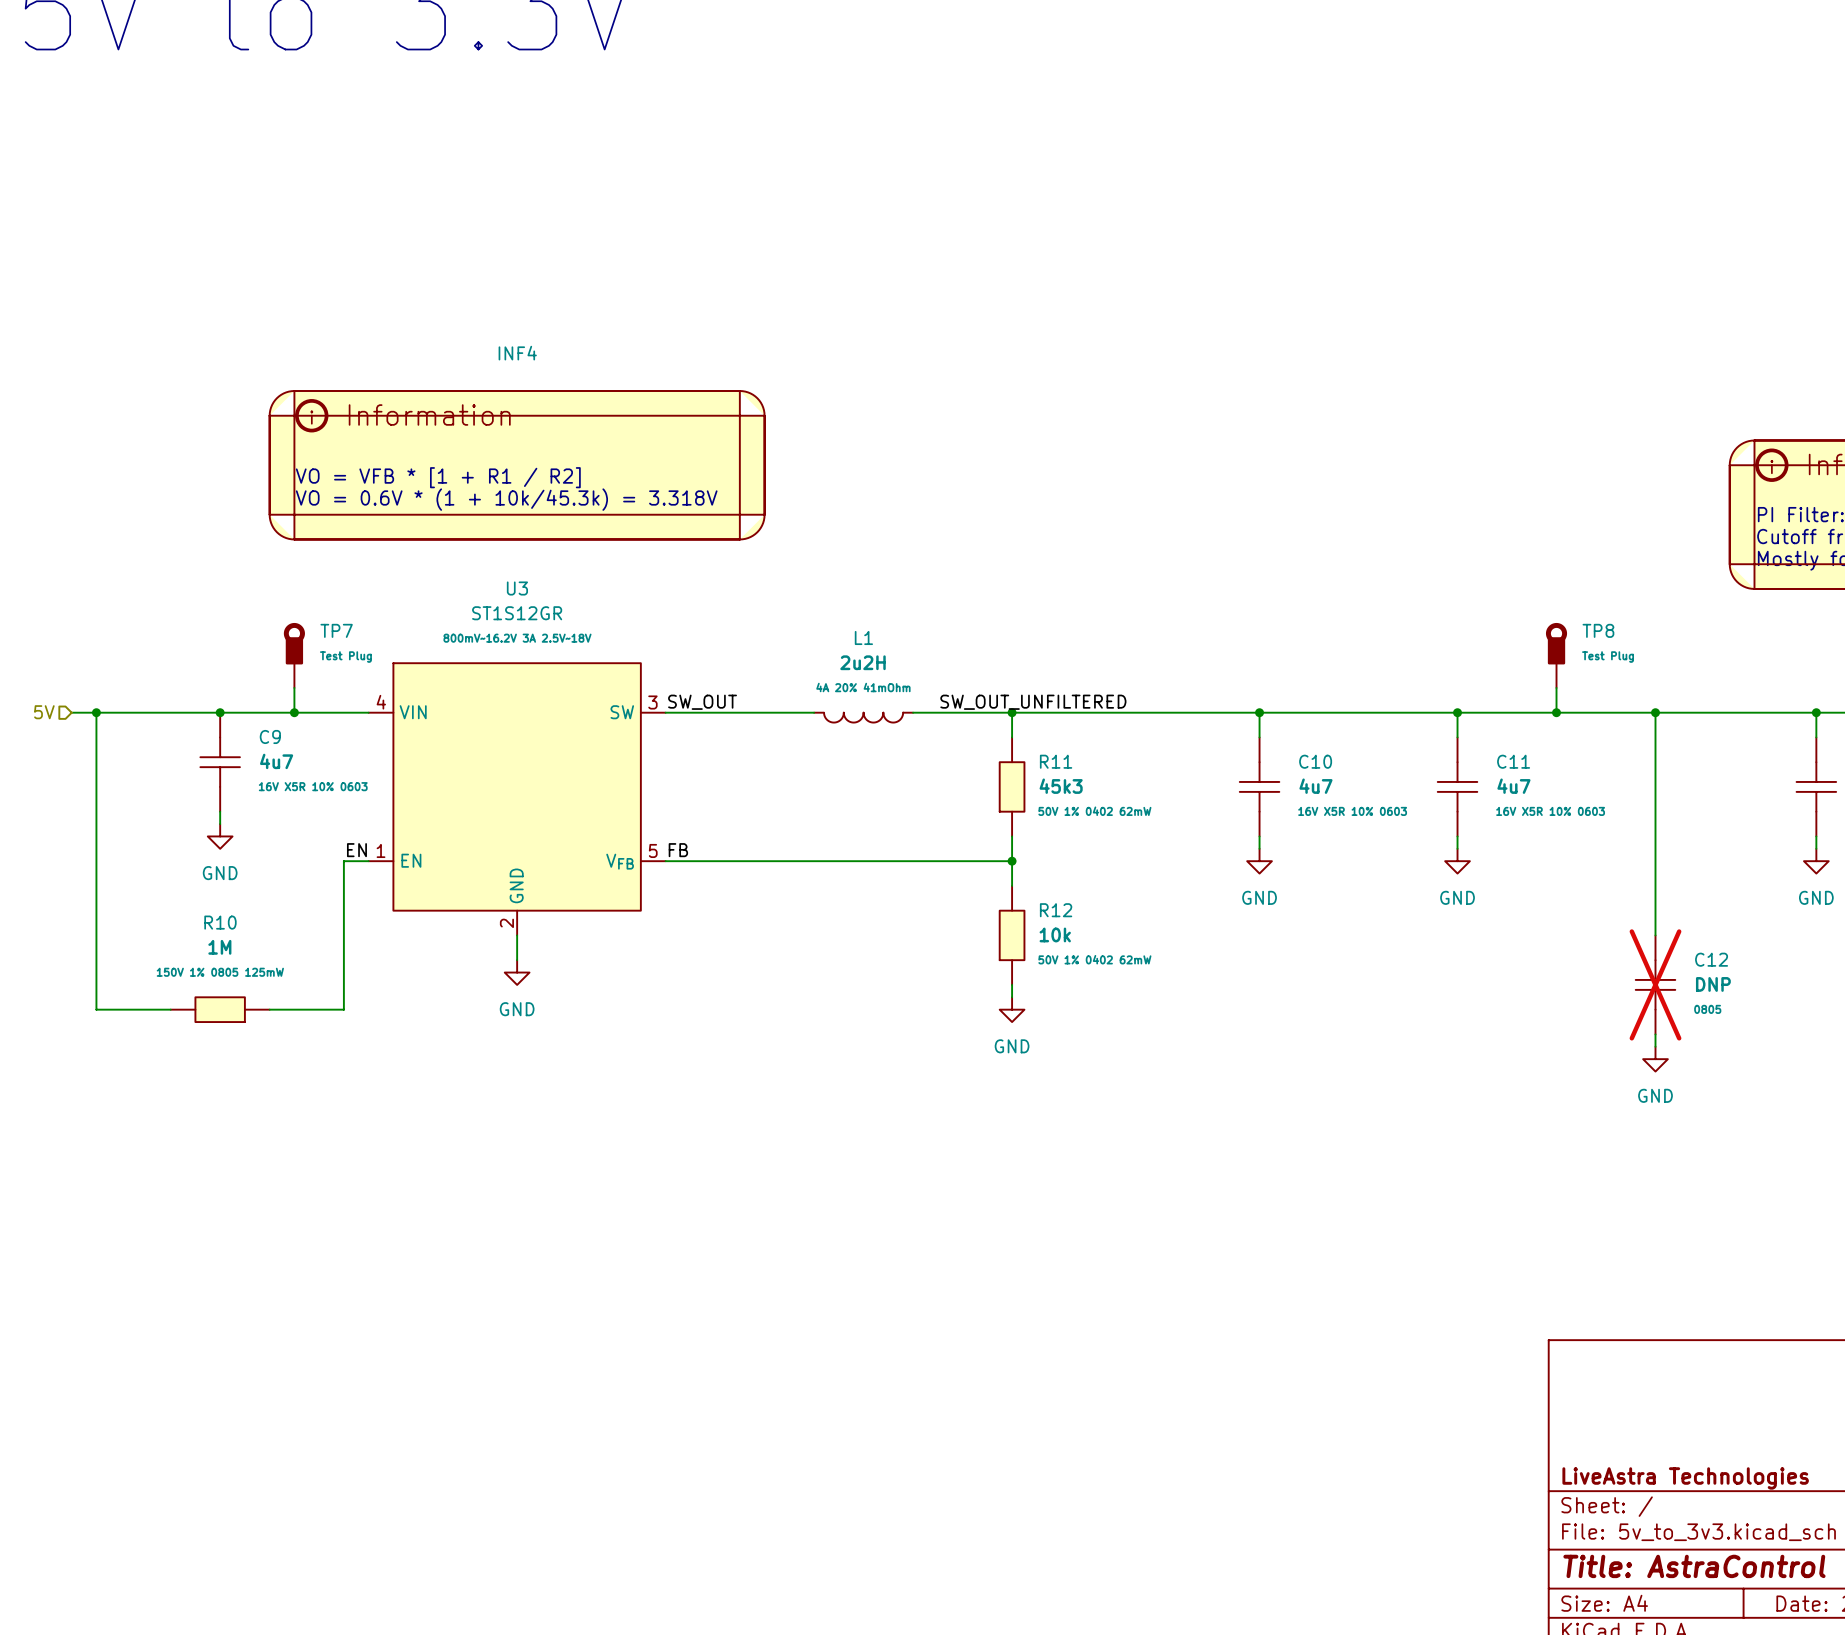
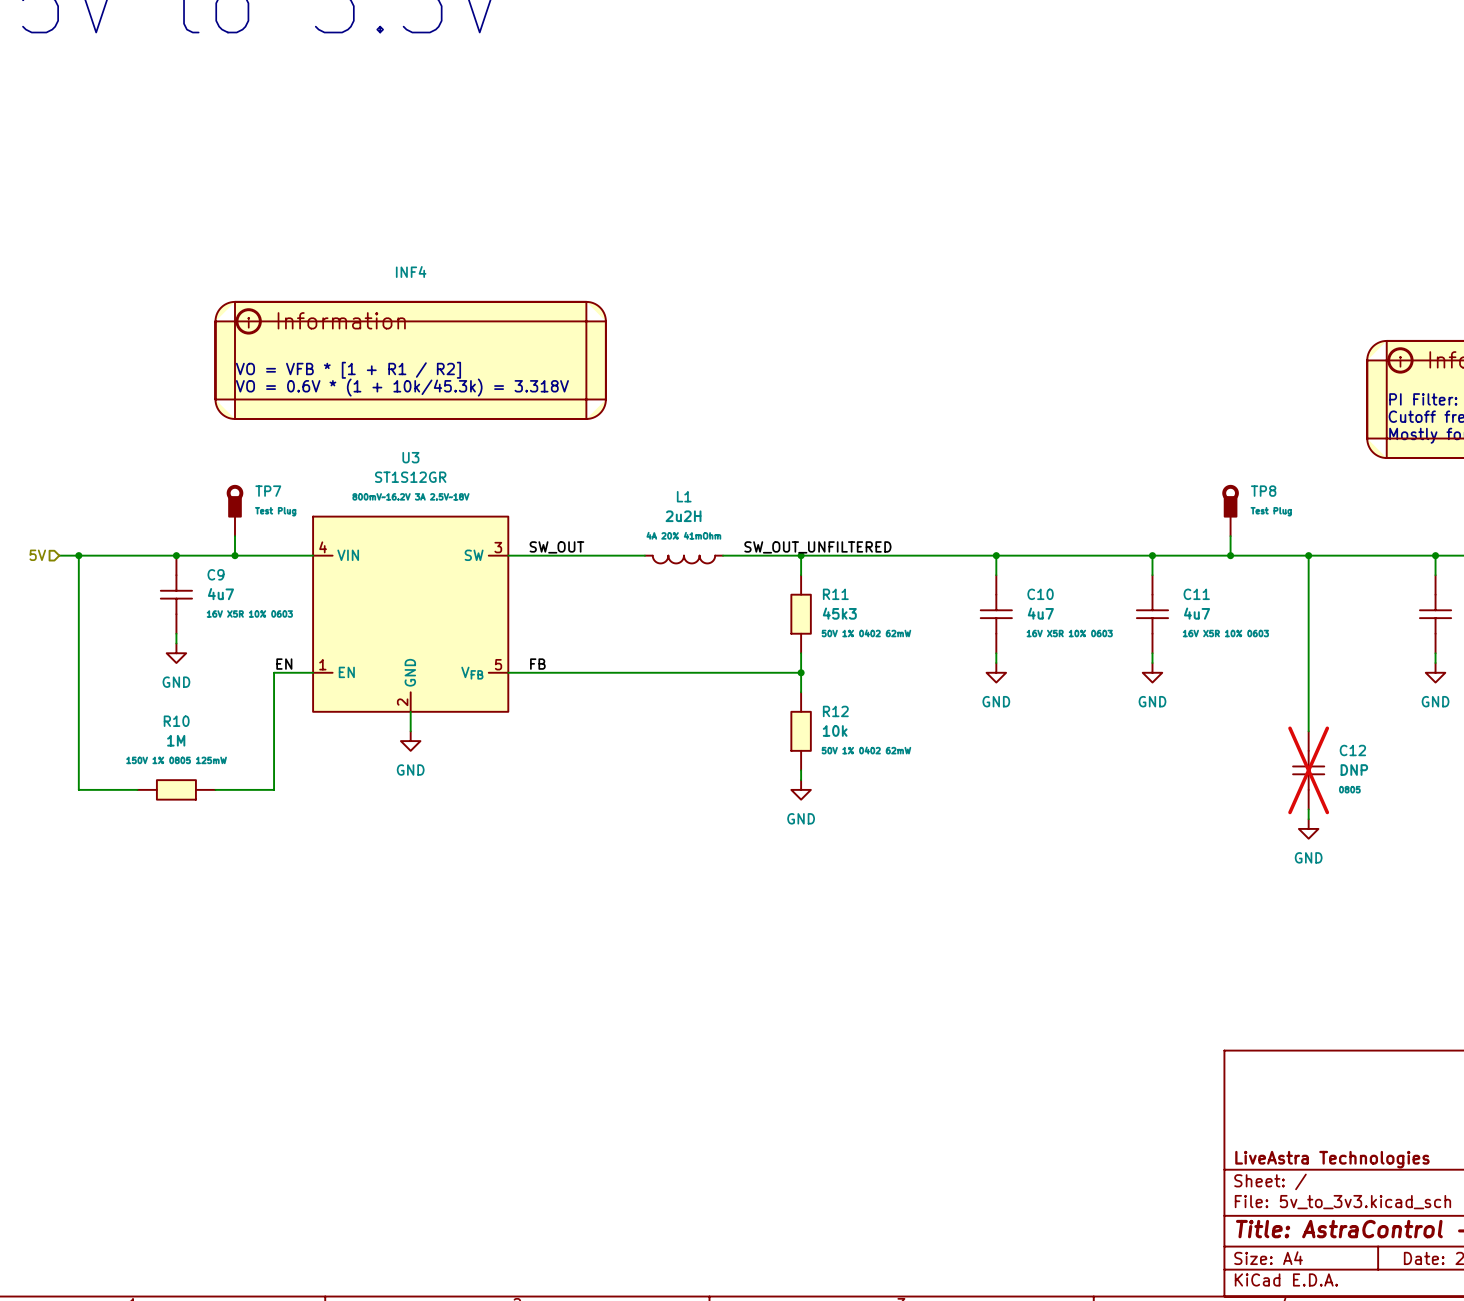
U3 symbol: [368, 663, 666, 936] -> [313, 516, 509, 712]
power symbol position: GND (517, 972) -> GND (410, 741)

